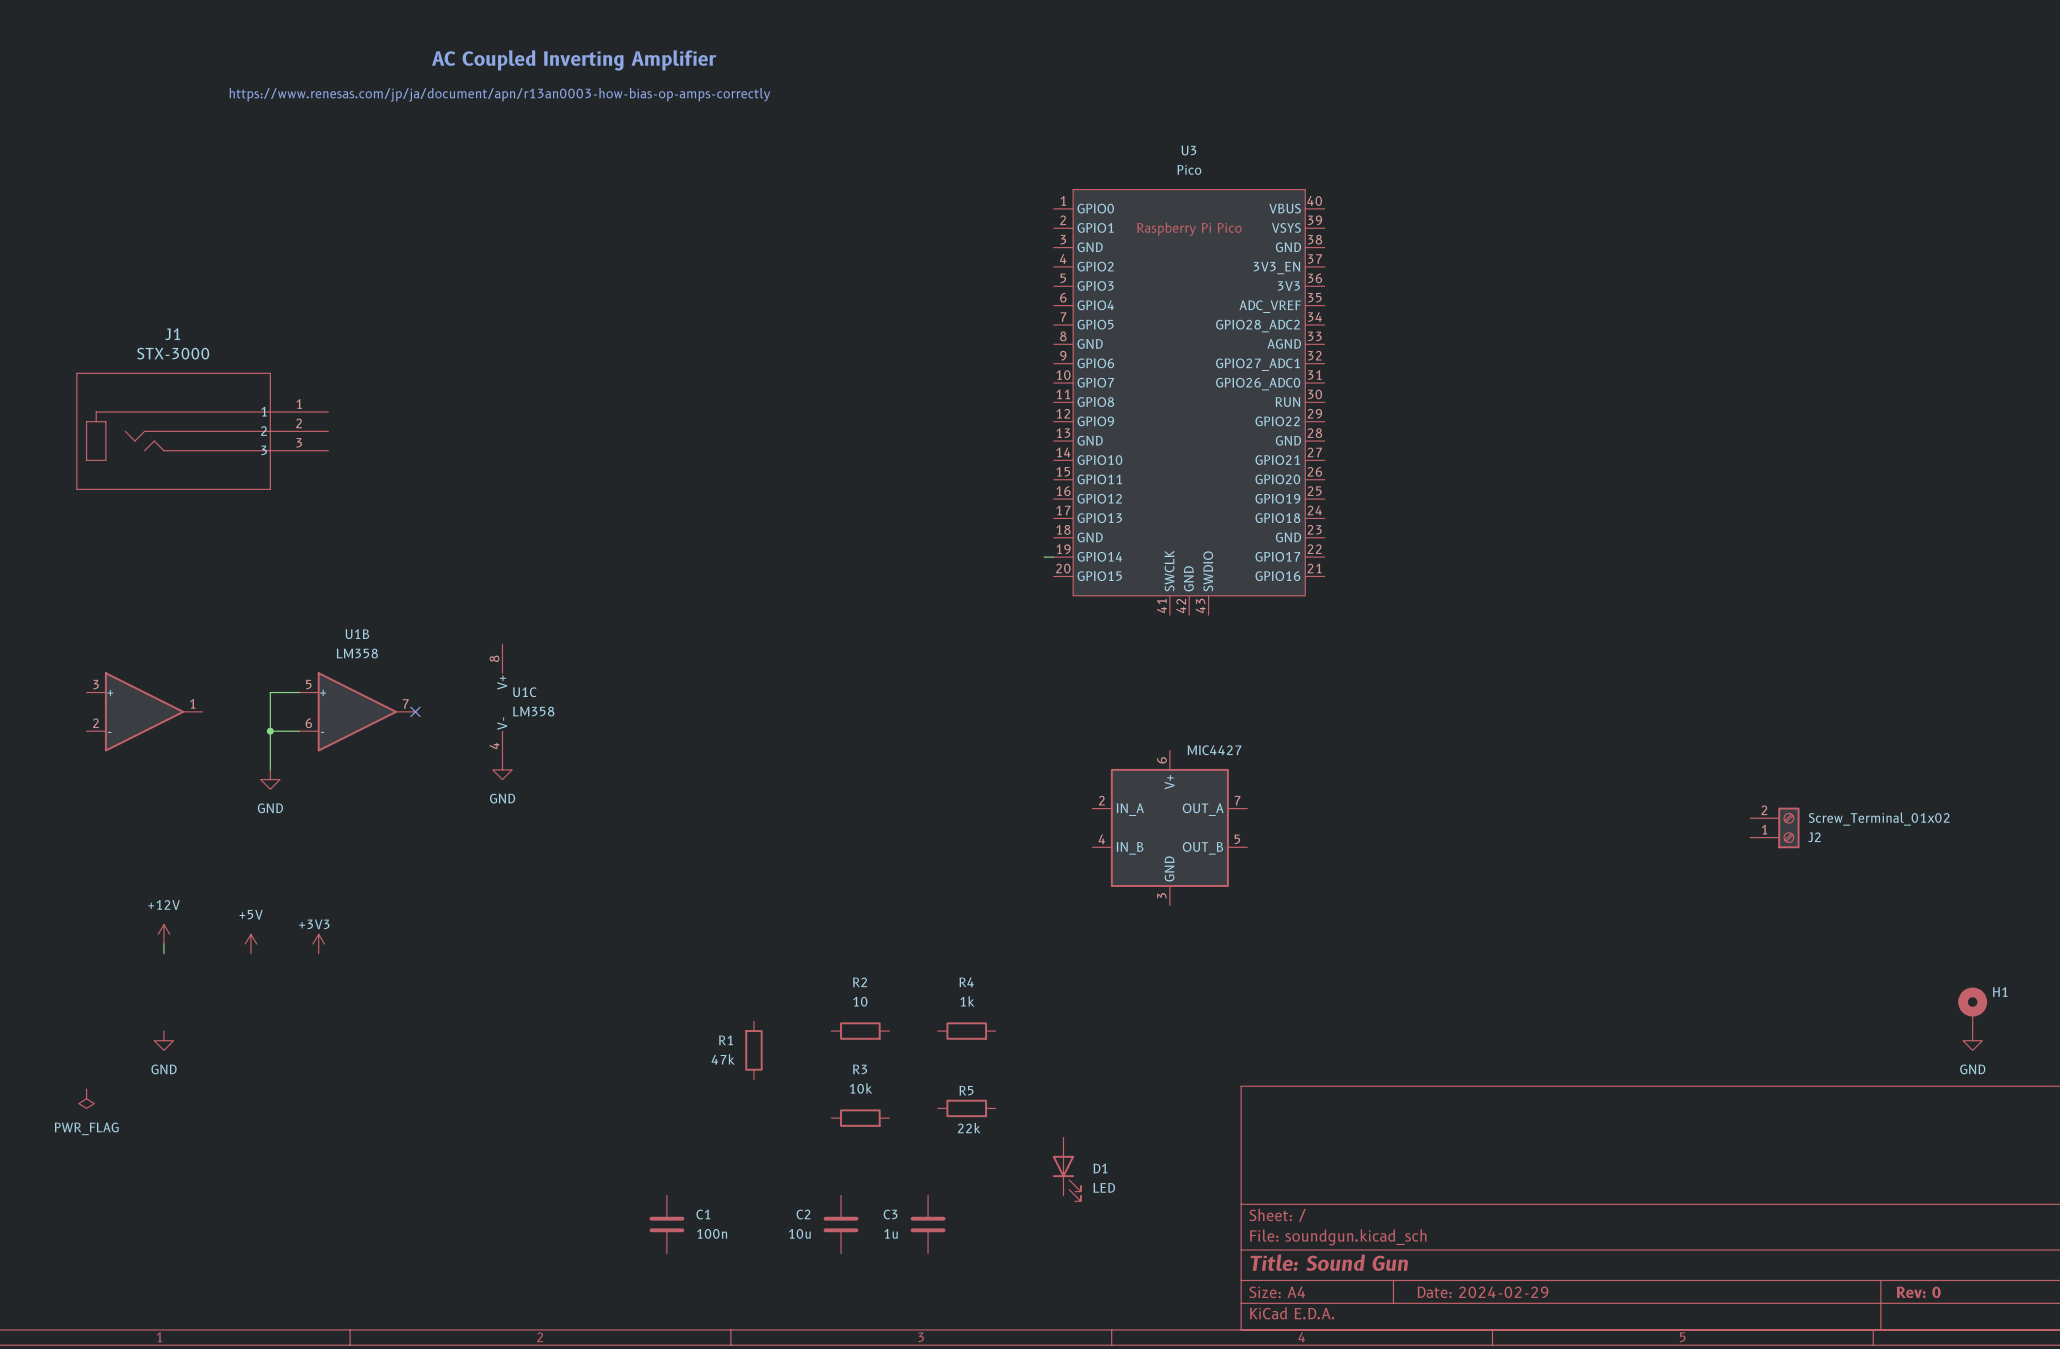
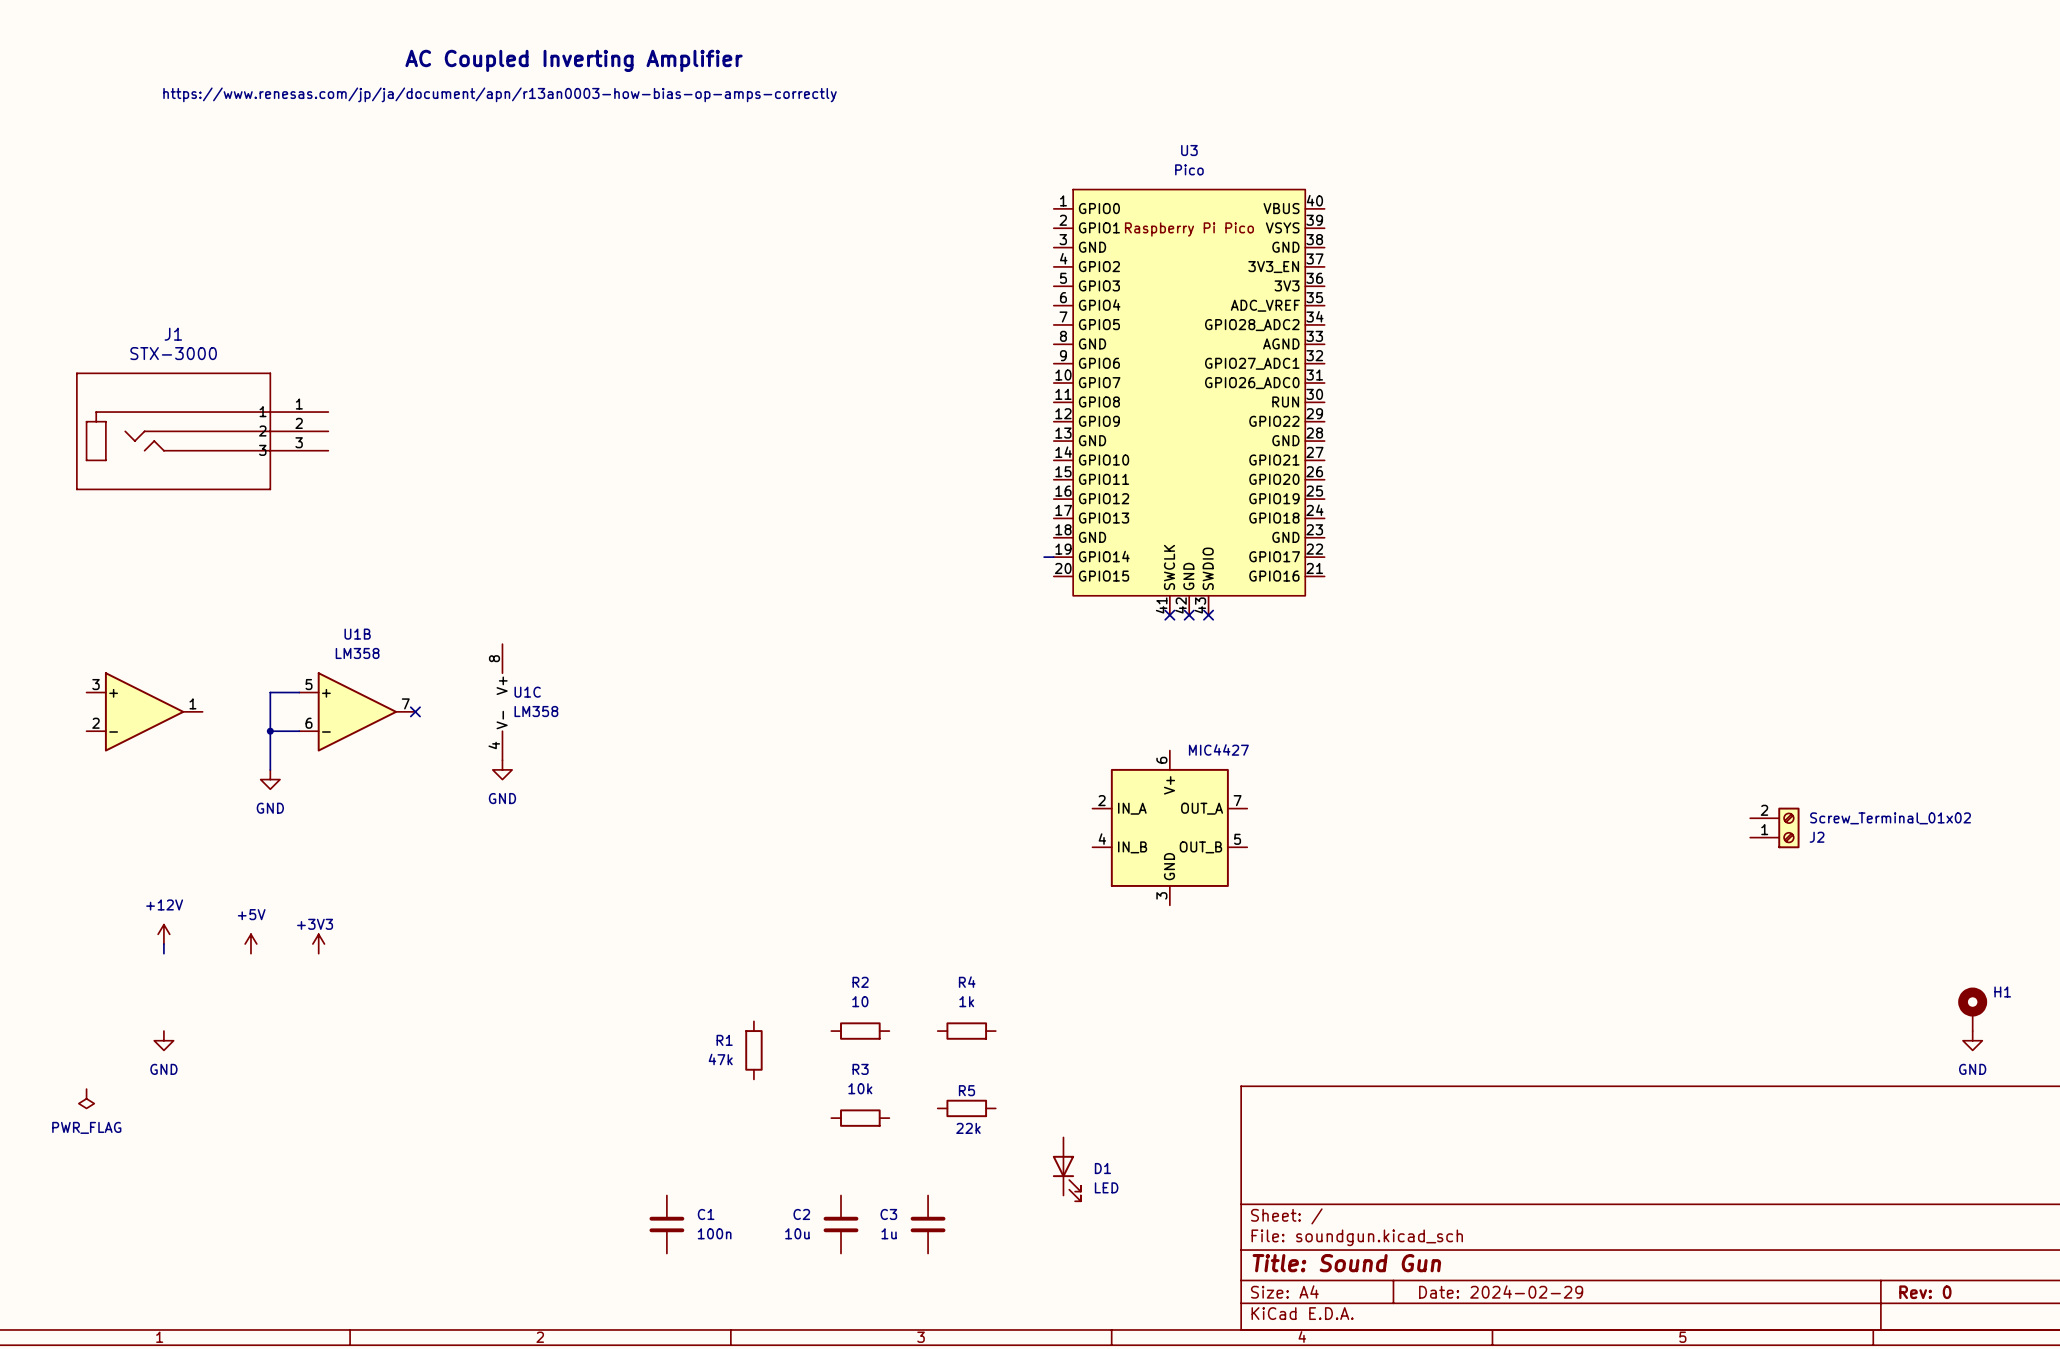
no-connect mark: none -> (1169, 615)
no-connect mark: none -> (1189, 615)
no-connect mark: none -> (1208, 615)

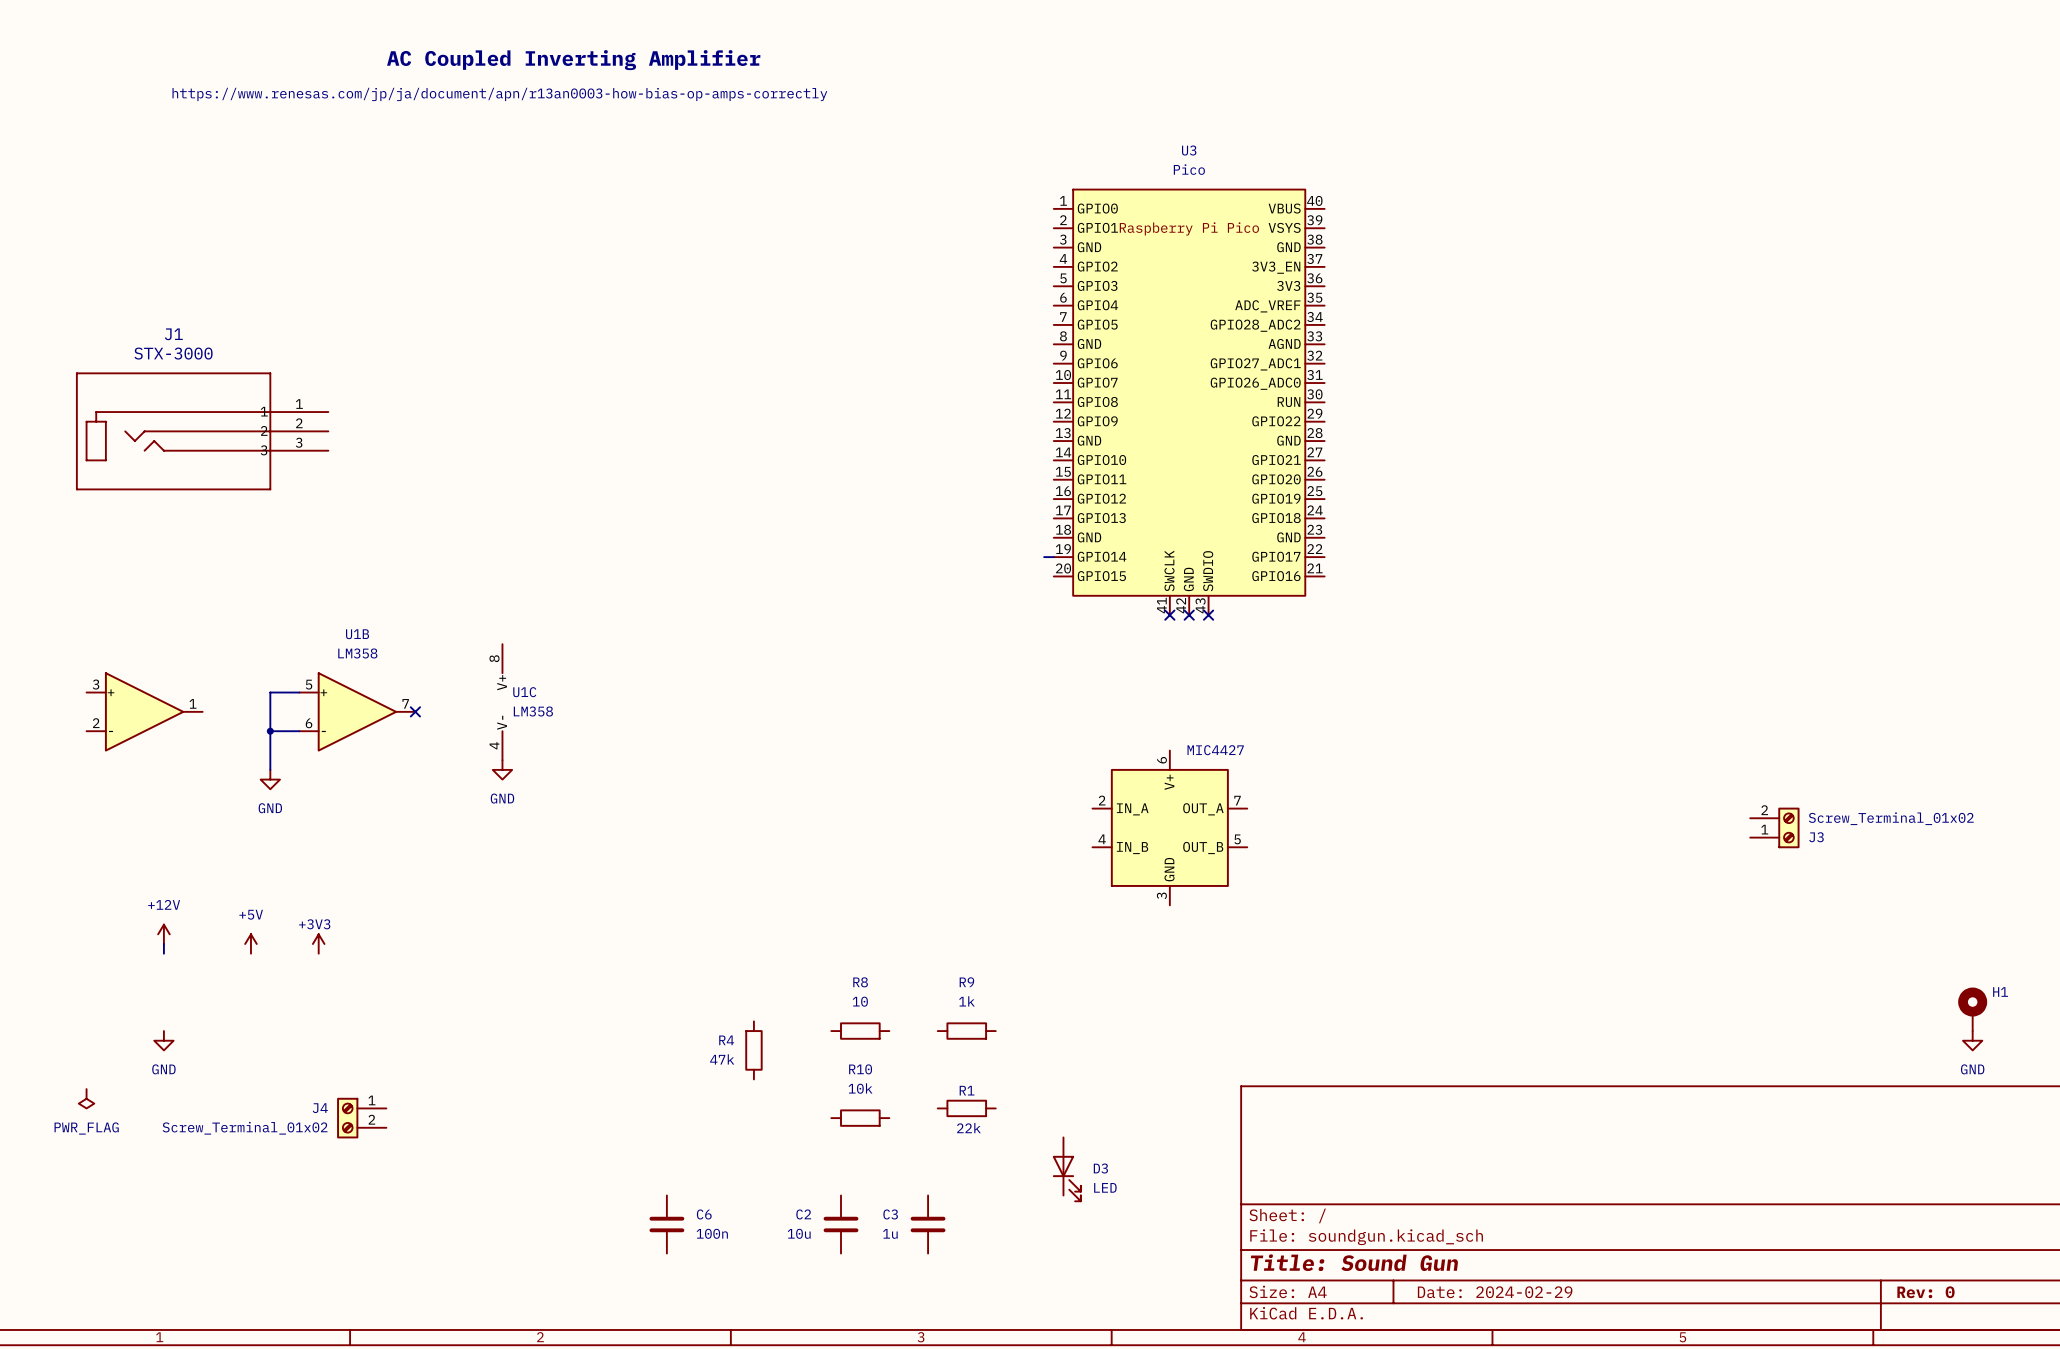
J2 name: J2 (1817, 837) -> J3 (1816, 837)
R2 name: R2 (860, 982) -> R8 (860, 982)
R4 name: R4 (967, 982) -> R9 (966, 982)
R1 name: R1 (724, 1040) -> R4 (726, 1040)
R3 name: R3 (860, 1069) -> R10 (860, 1069)
R5 name: R5 (966, 1090) -> R1 (967, 1090)
J4: none -> Screw_Terminal_01x02 (361, 1118)
D1 name: D1 (1102, 1168) -> D3 (1100, 1168)
C1 name: C1 (706, 1214) -> C6 (704, 1214)

